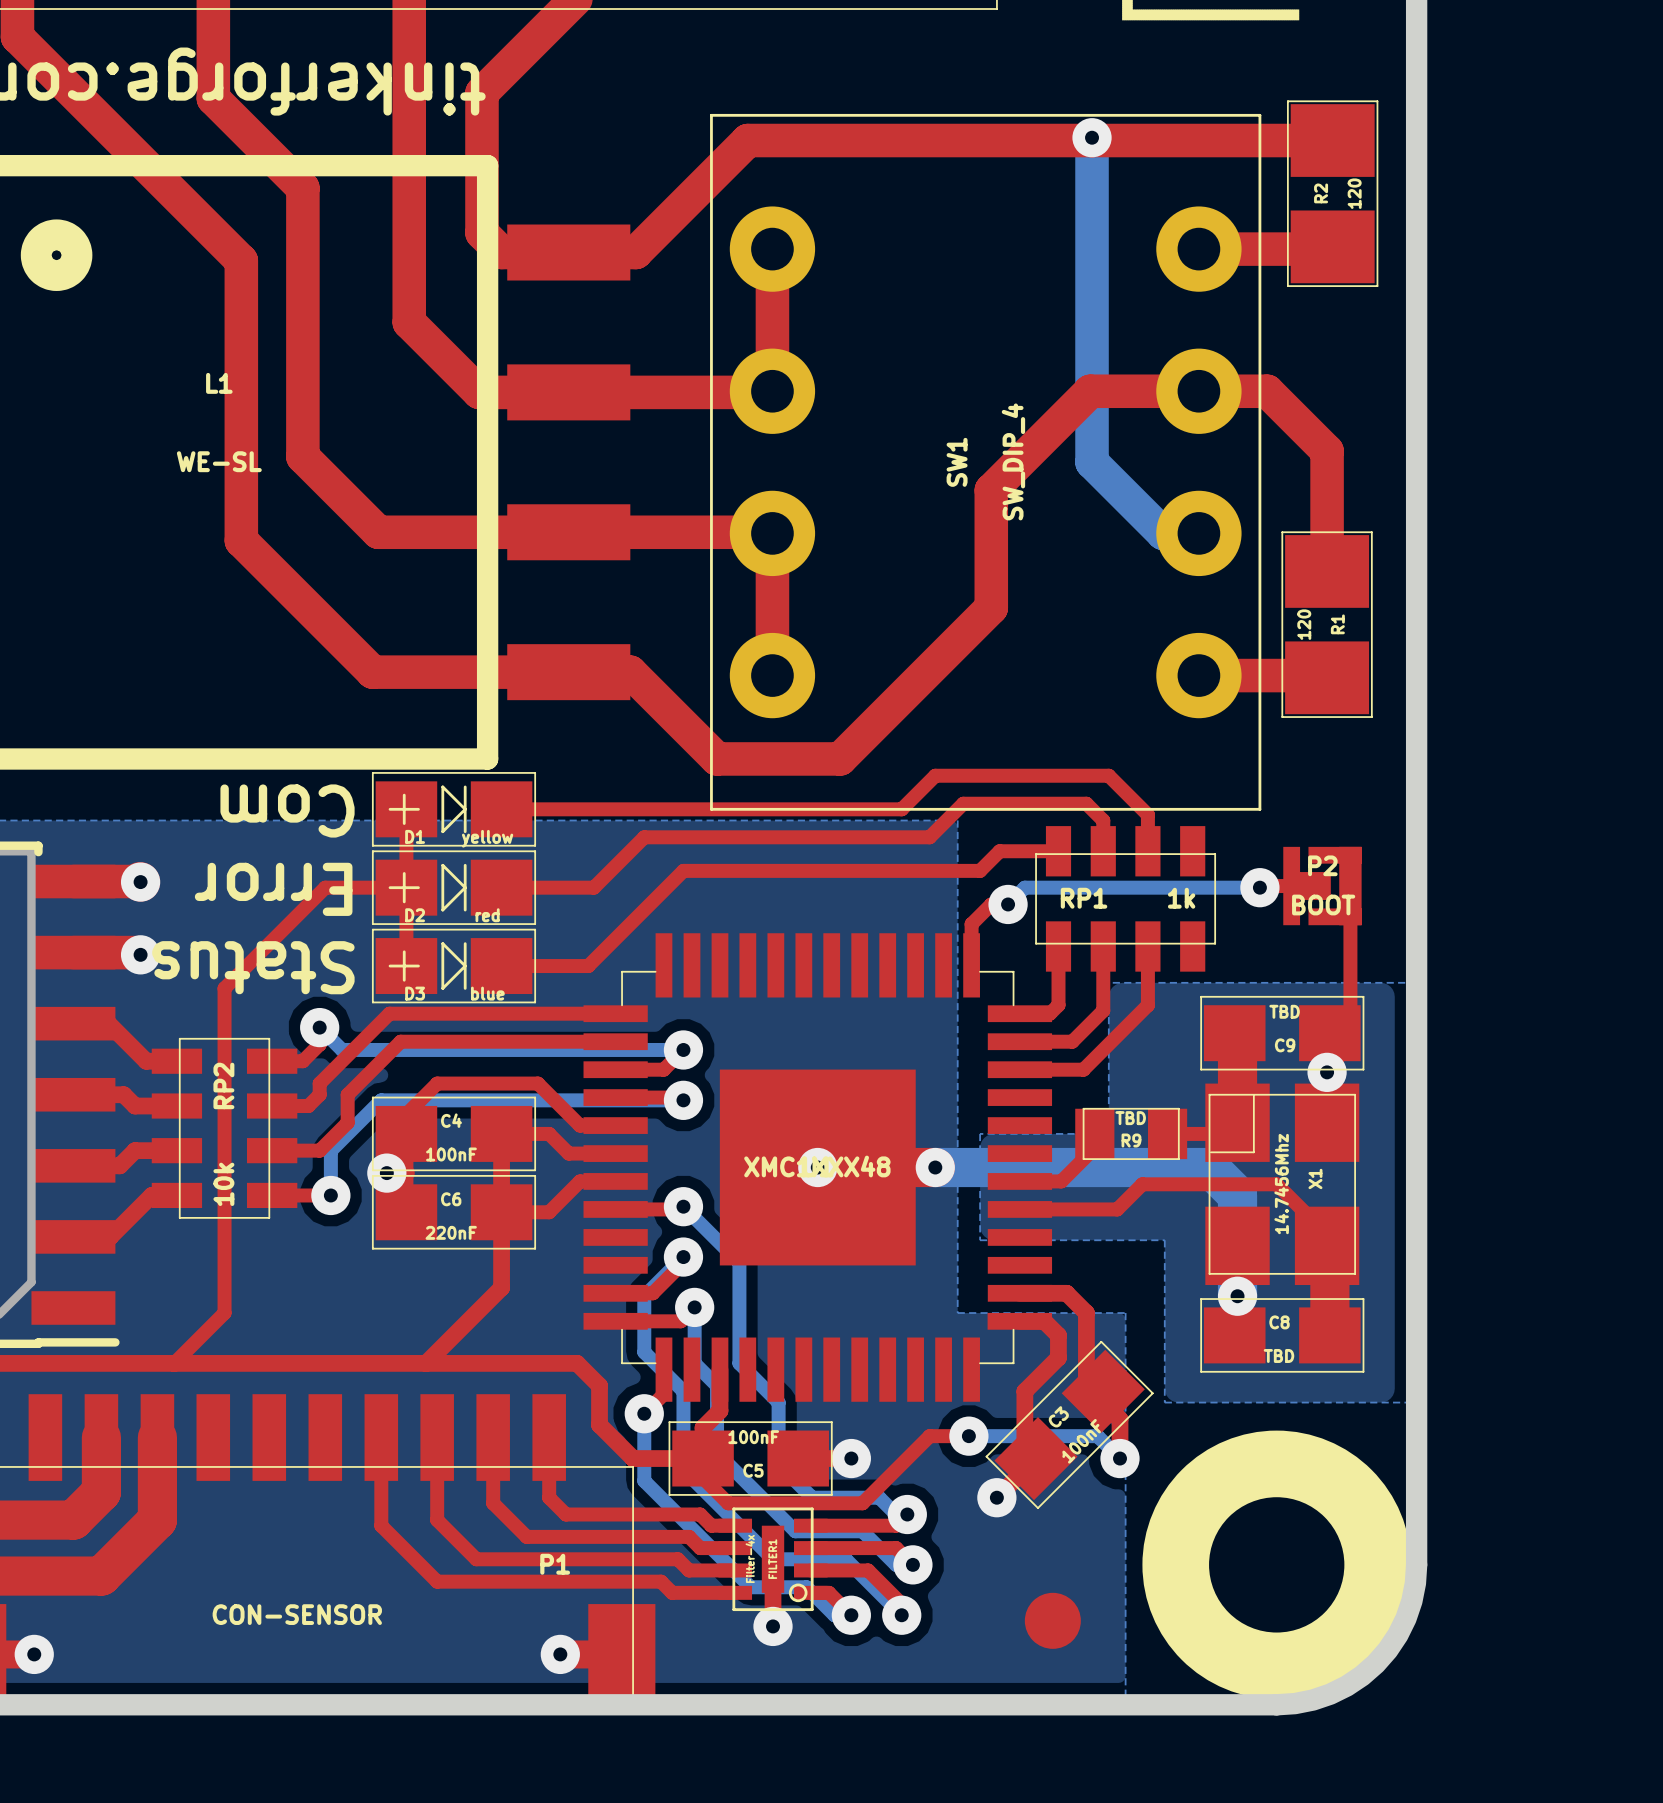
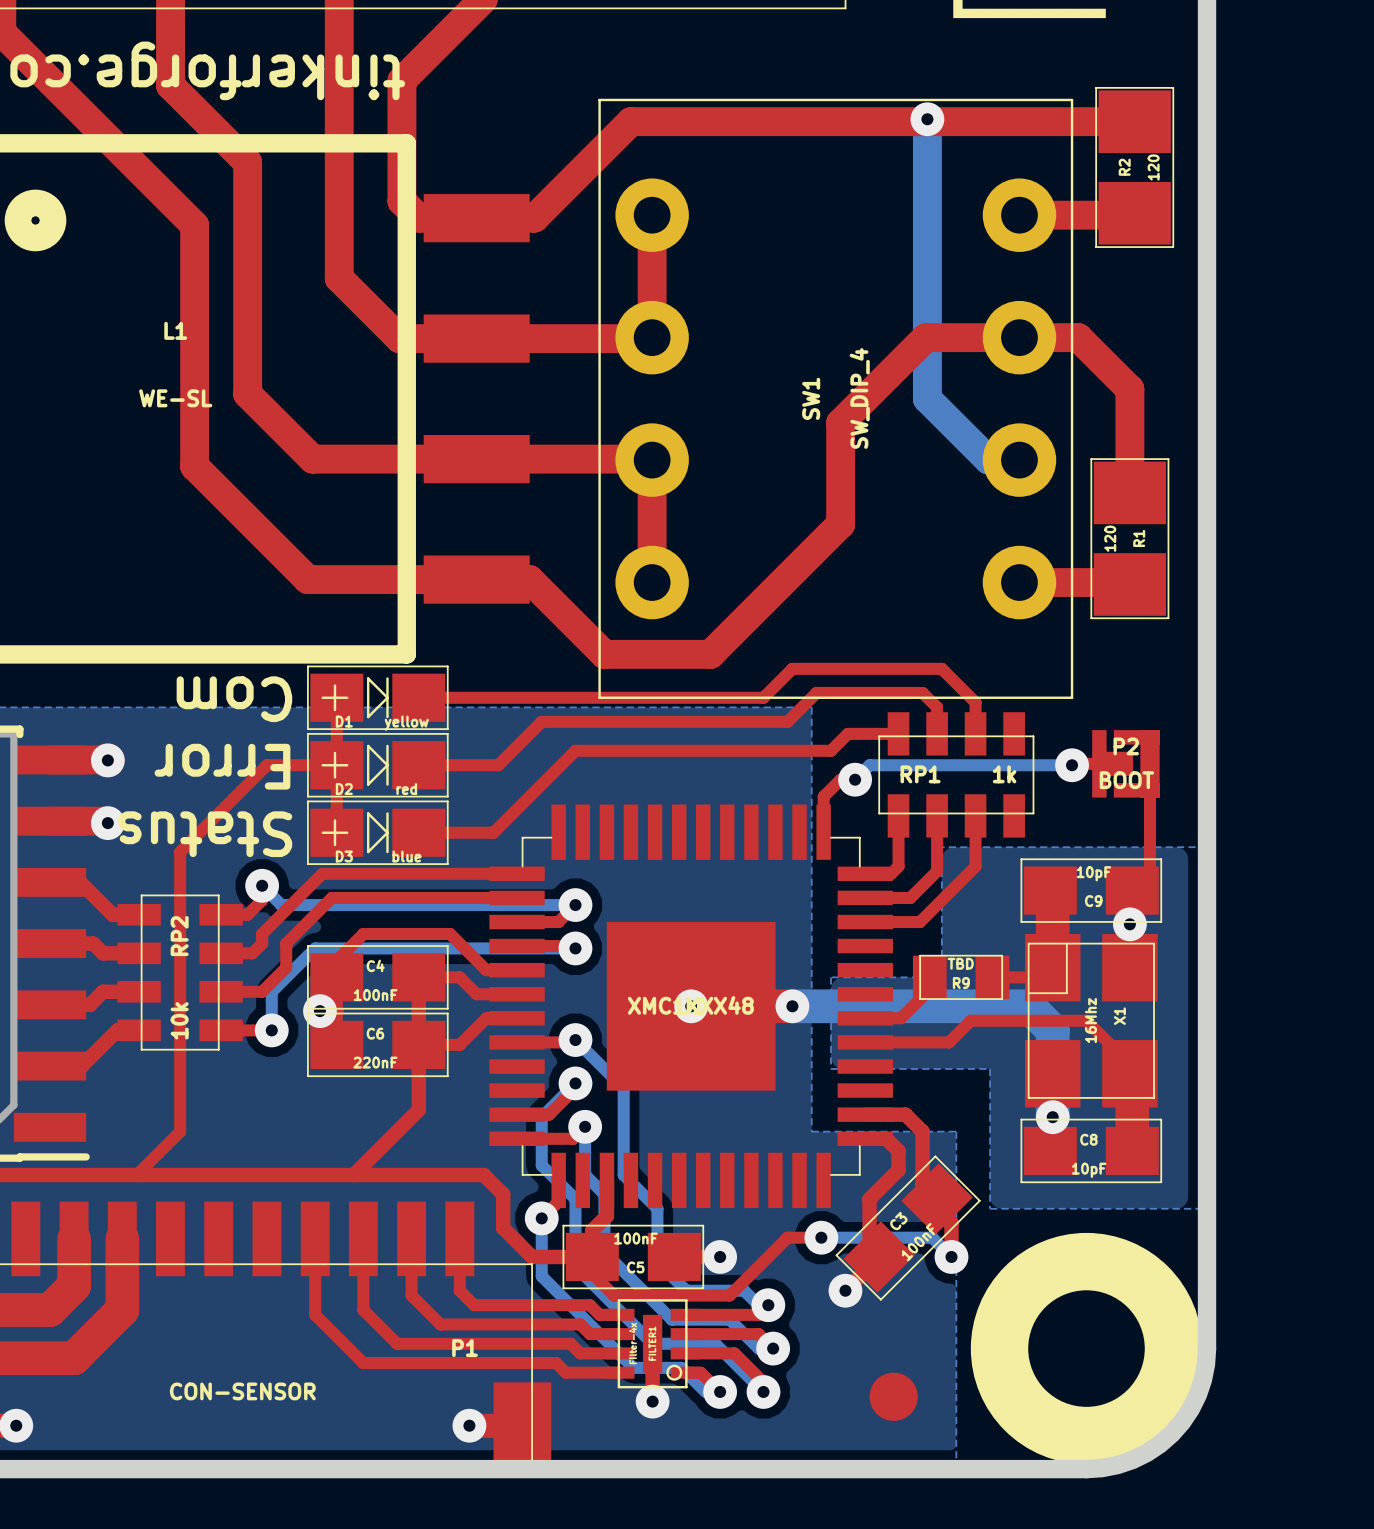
C9 value: TBD (1284, 1011) -> 10pF (1093, 873)
X1 value: 14.7456Mhz (1281, 1184) -> 16Mhz (1090, 1020)
C8 value: TBD (1278, 1355) -> 10pF (1089, 1170)

